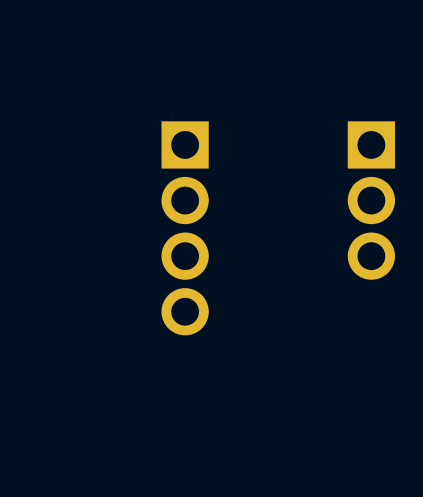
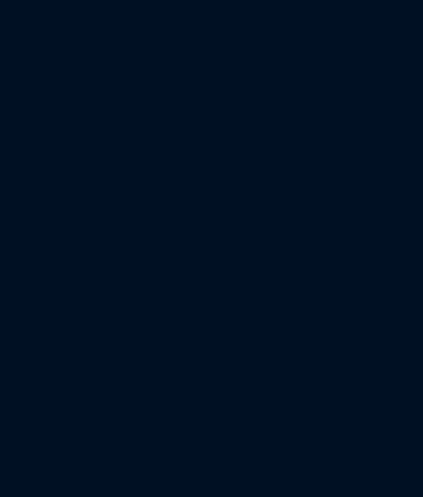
part: (371, 200) -> none
part: (185, 228) -> none

